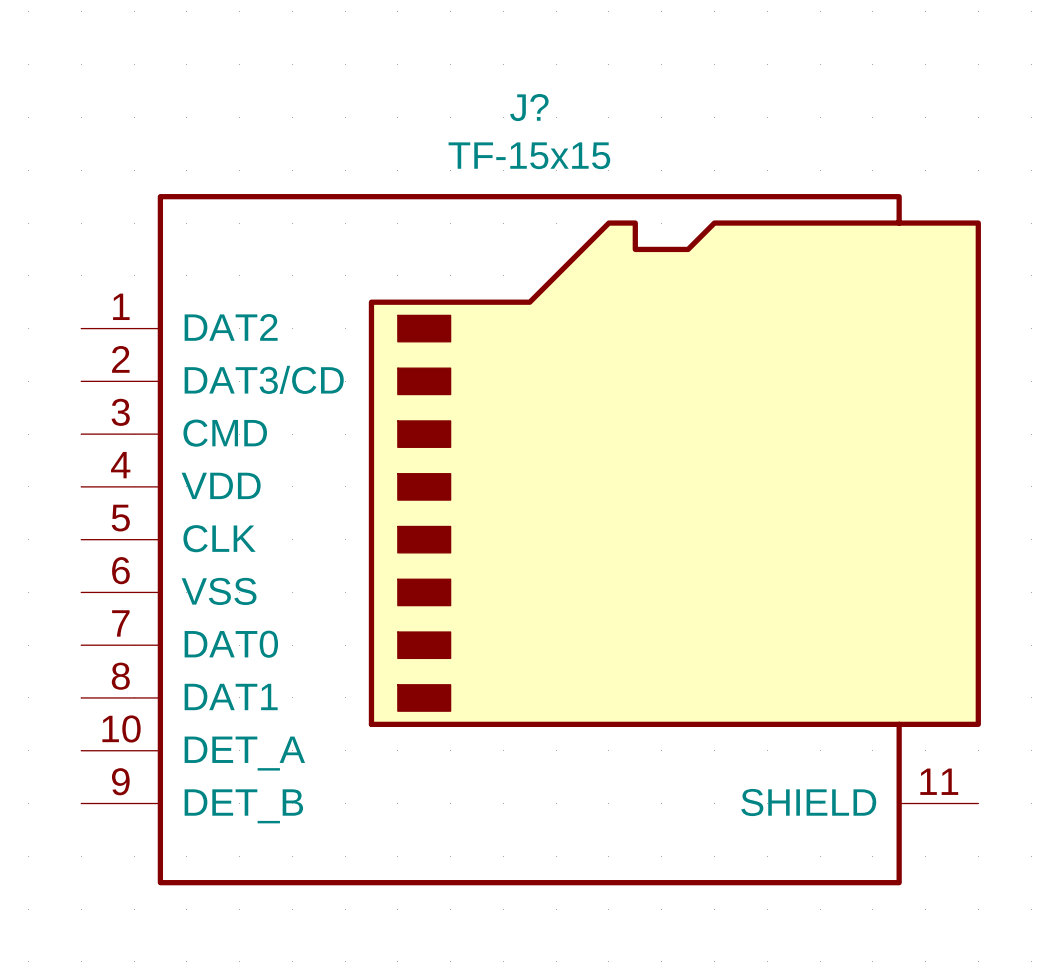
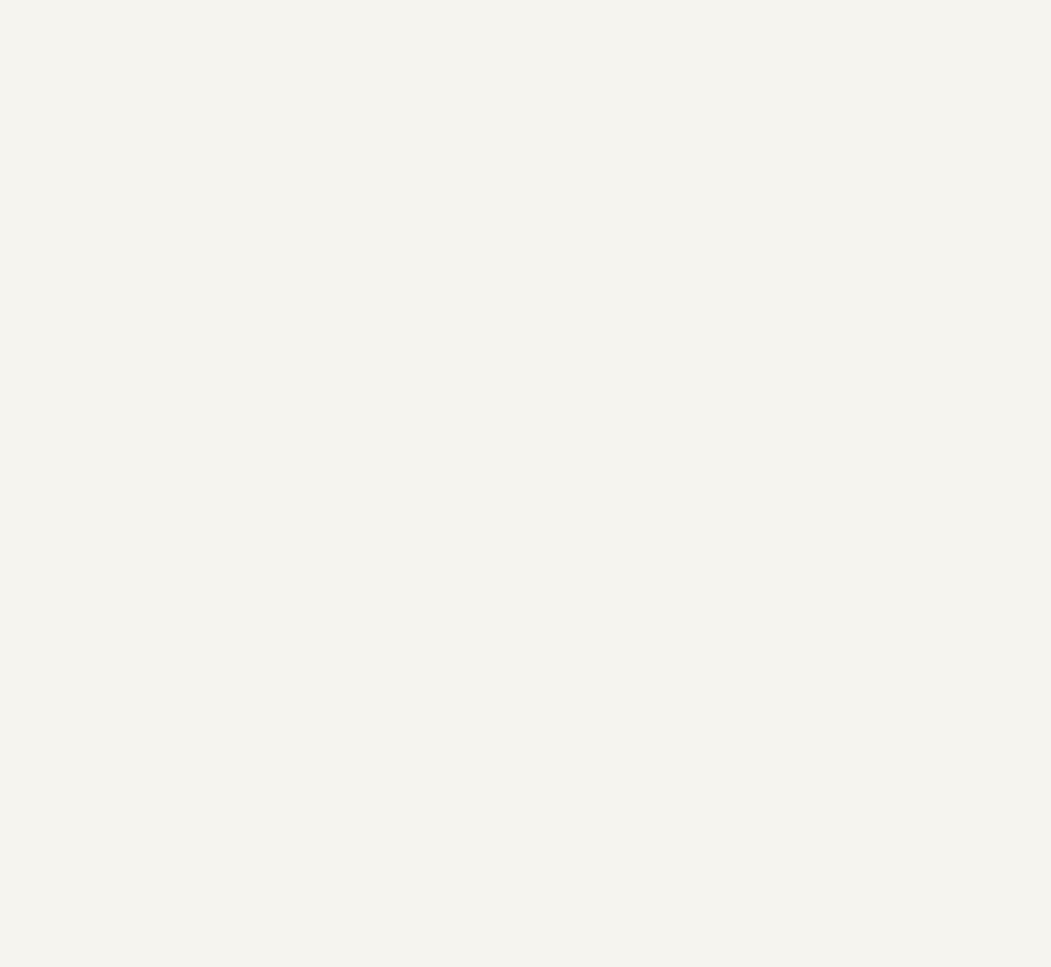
J?: TF-15x15 (531, 539) -> none

